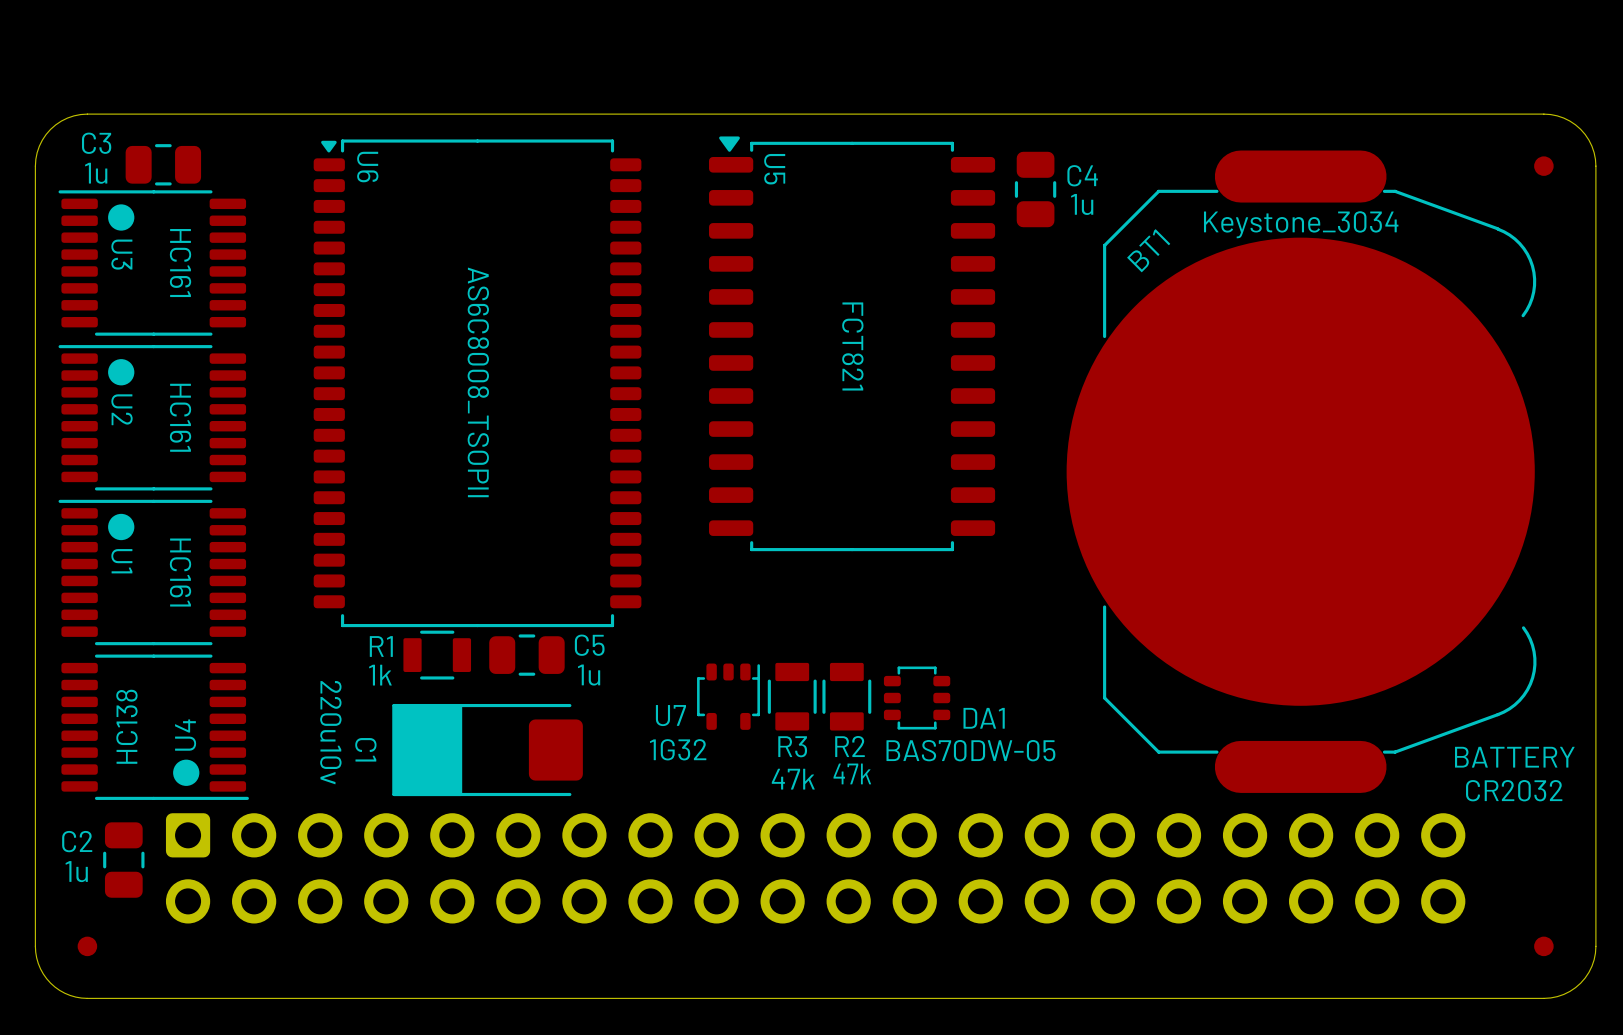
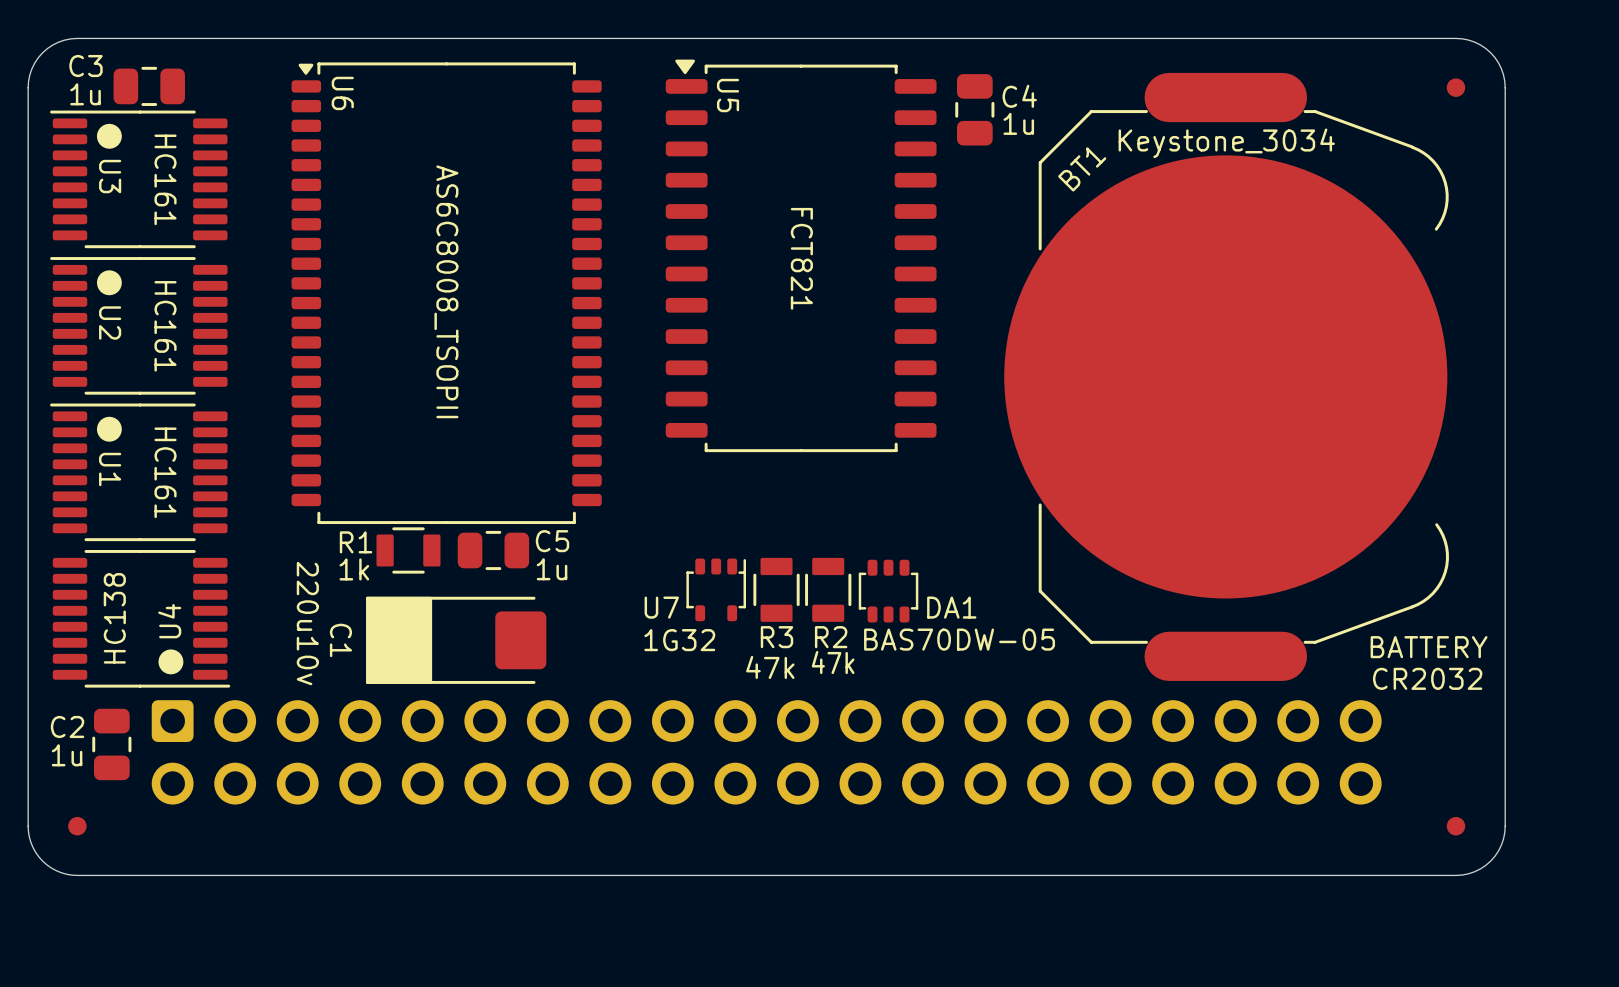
U7 position: (728, 696) -> (716, 589)
R3 position: (792, 696) -> (776, 589)
R2 position: (846, 696) -> (828, 589)
DA1 rotation: 0° (917, 698) -> 90° clockwise (888, 591)

